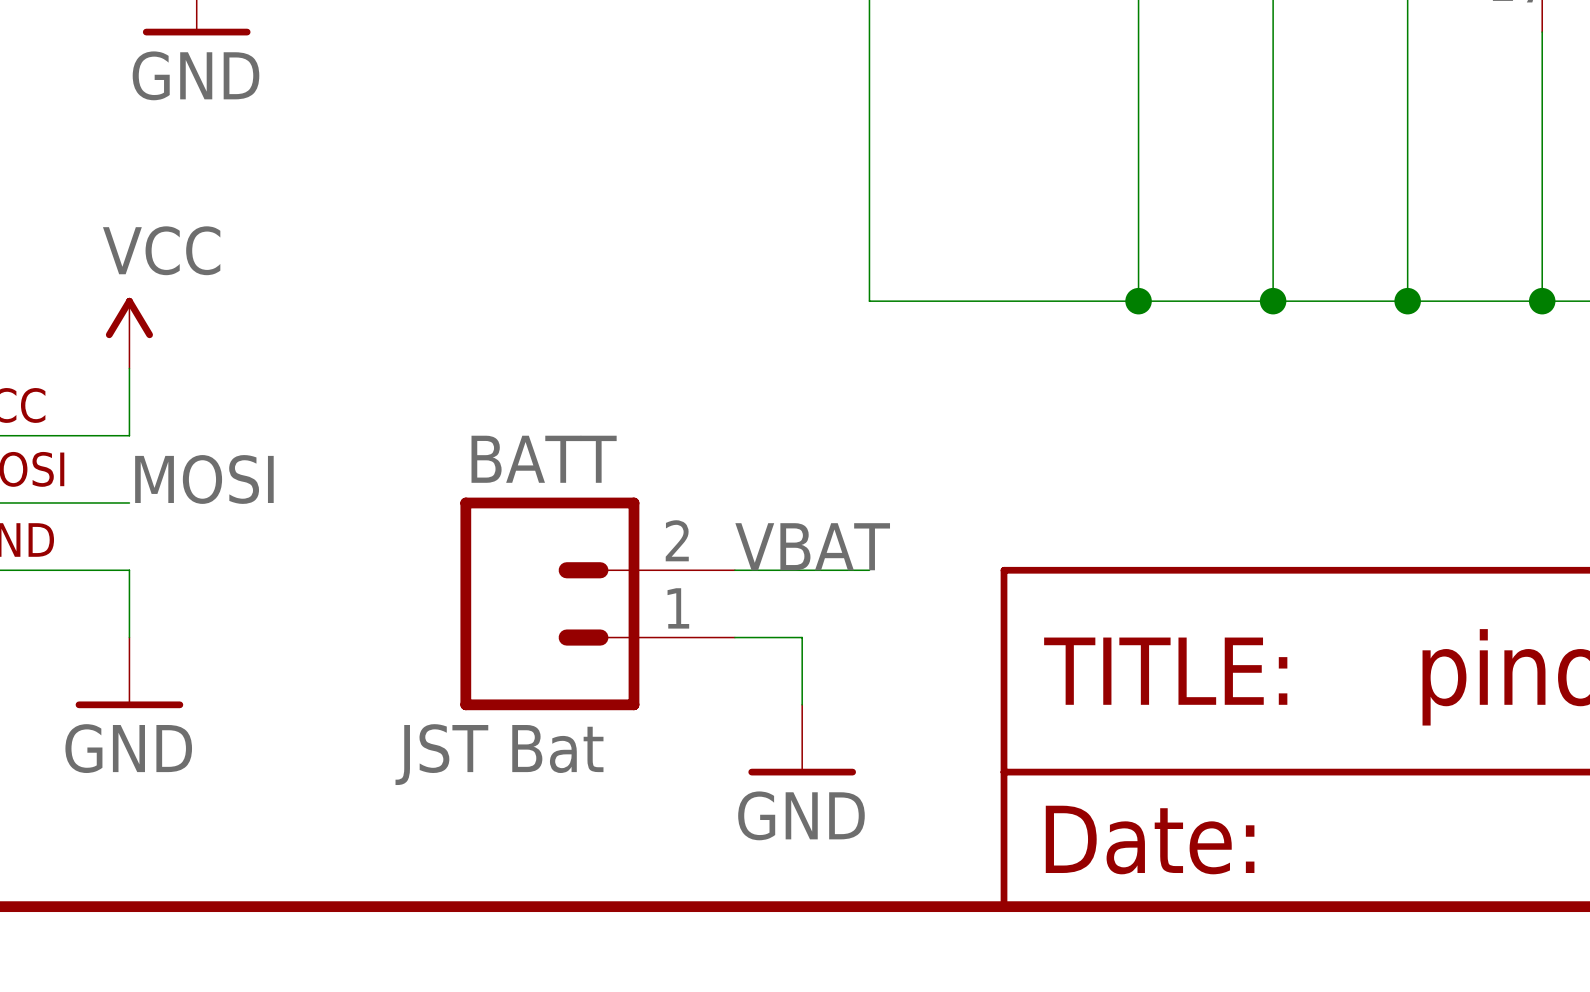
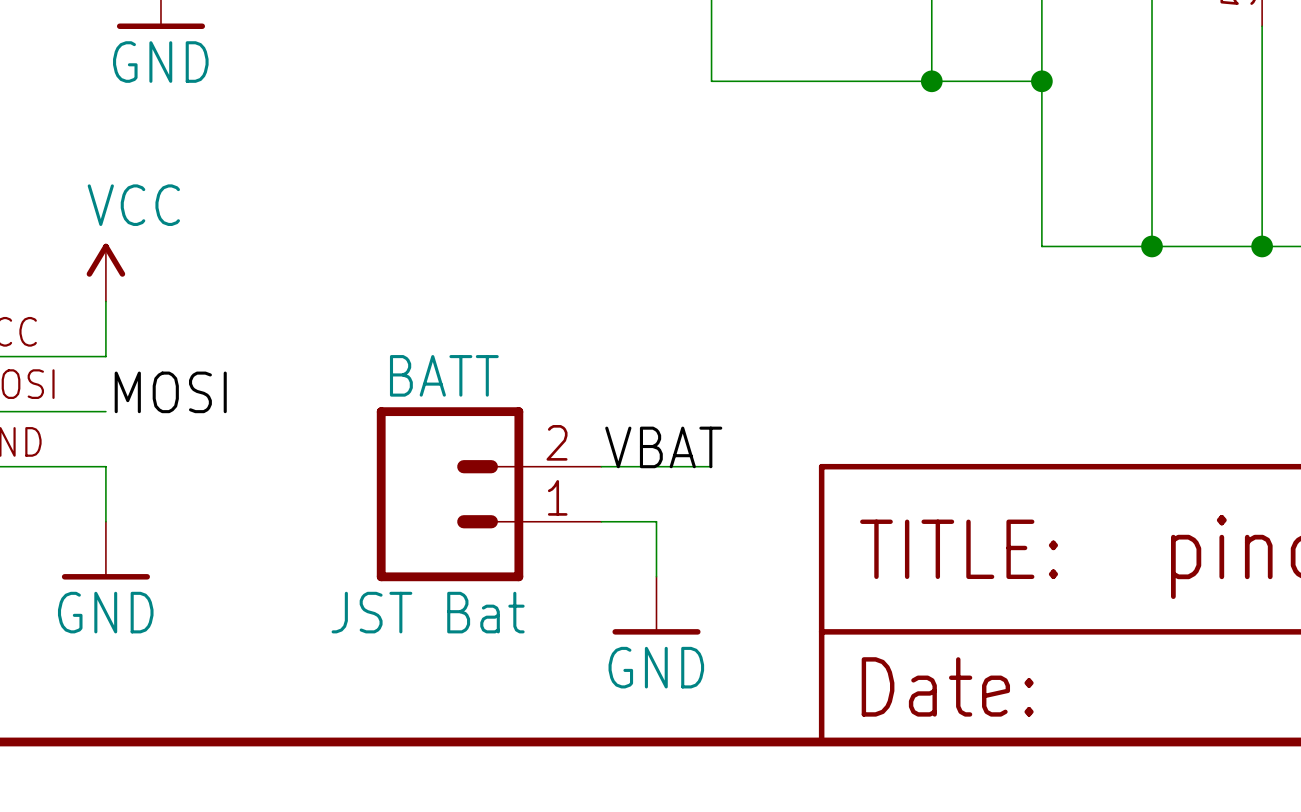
wire: (869, 99) (869, 301) (1273, 301) -> (711, 81) (1041, 81)
wire: (1138, 99) (1138, 301) -> none
junction: none -> (931, 81)
junction: none -> (1041, 81)
junction: (1138, 301) -> none
junction: (1273, 301) -> none

